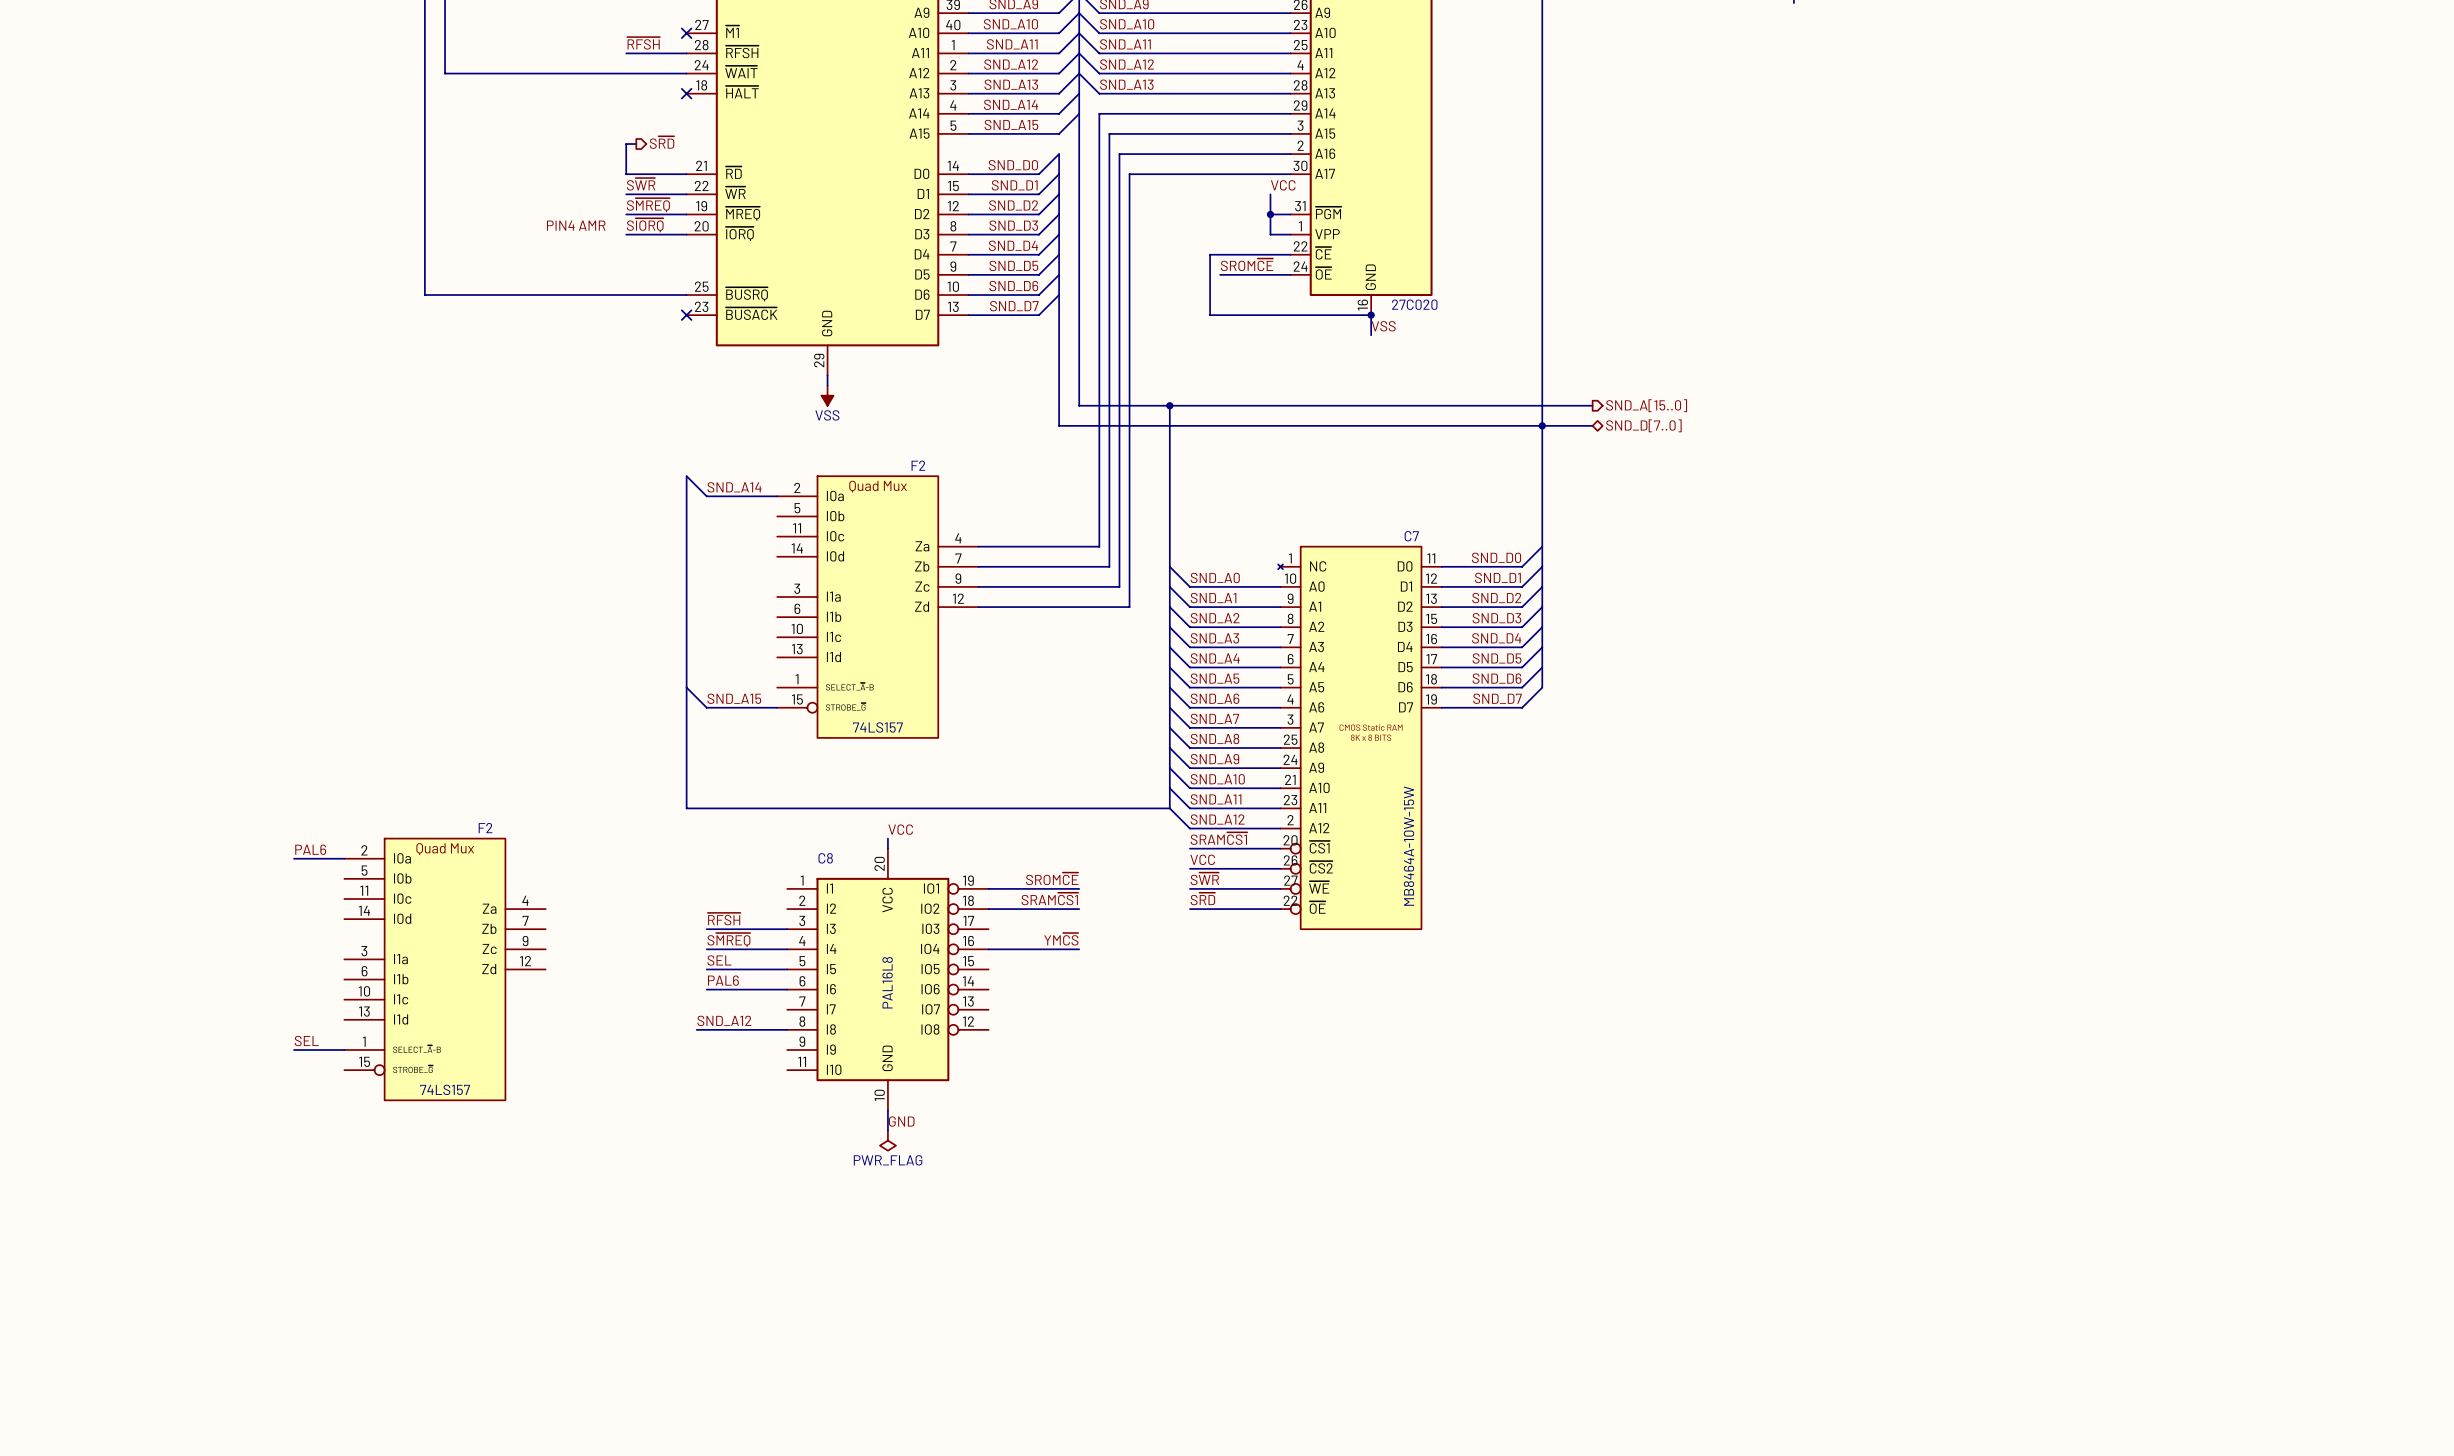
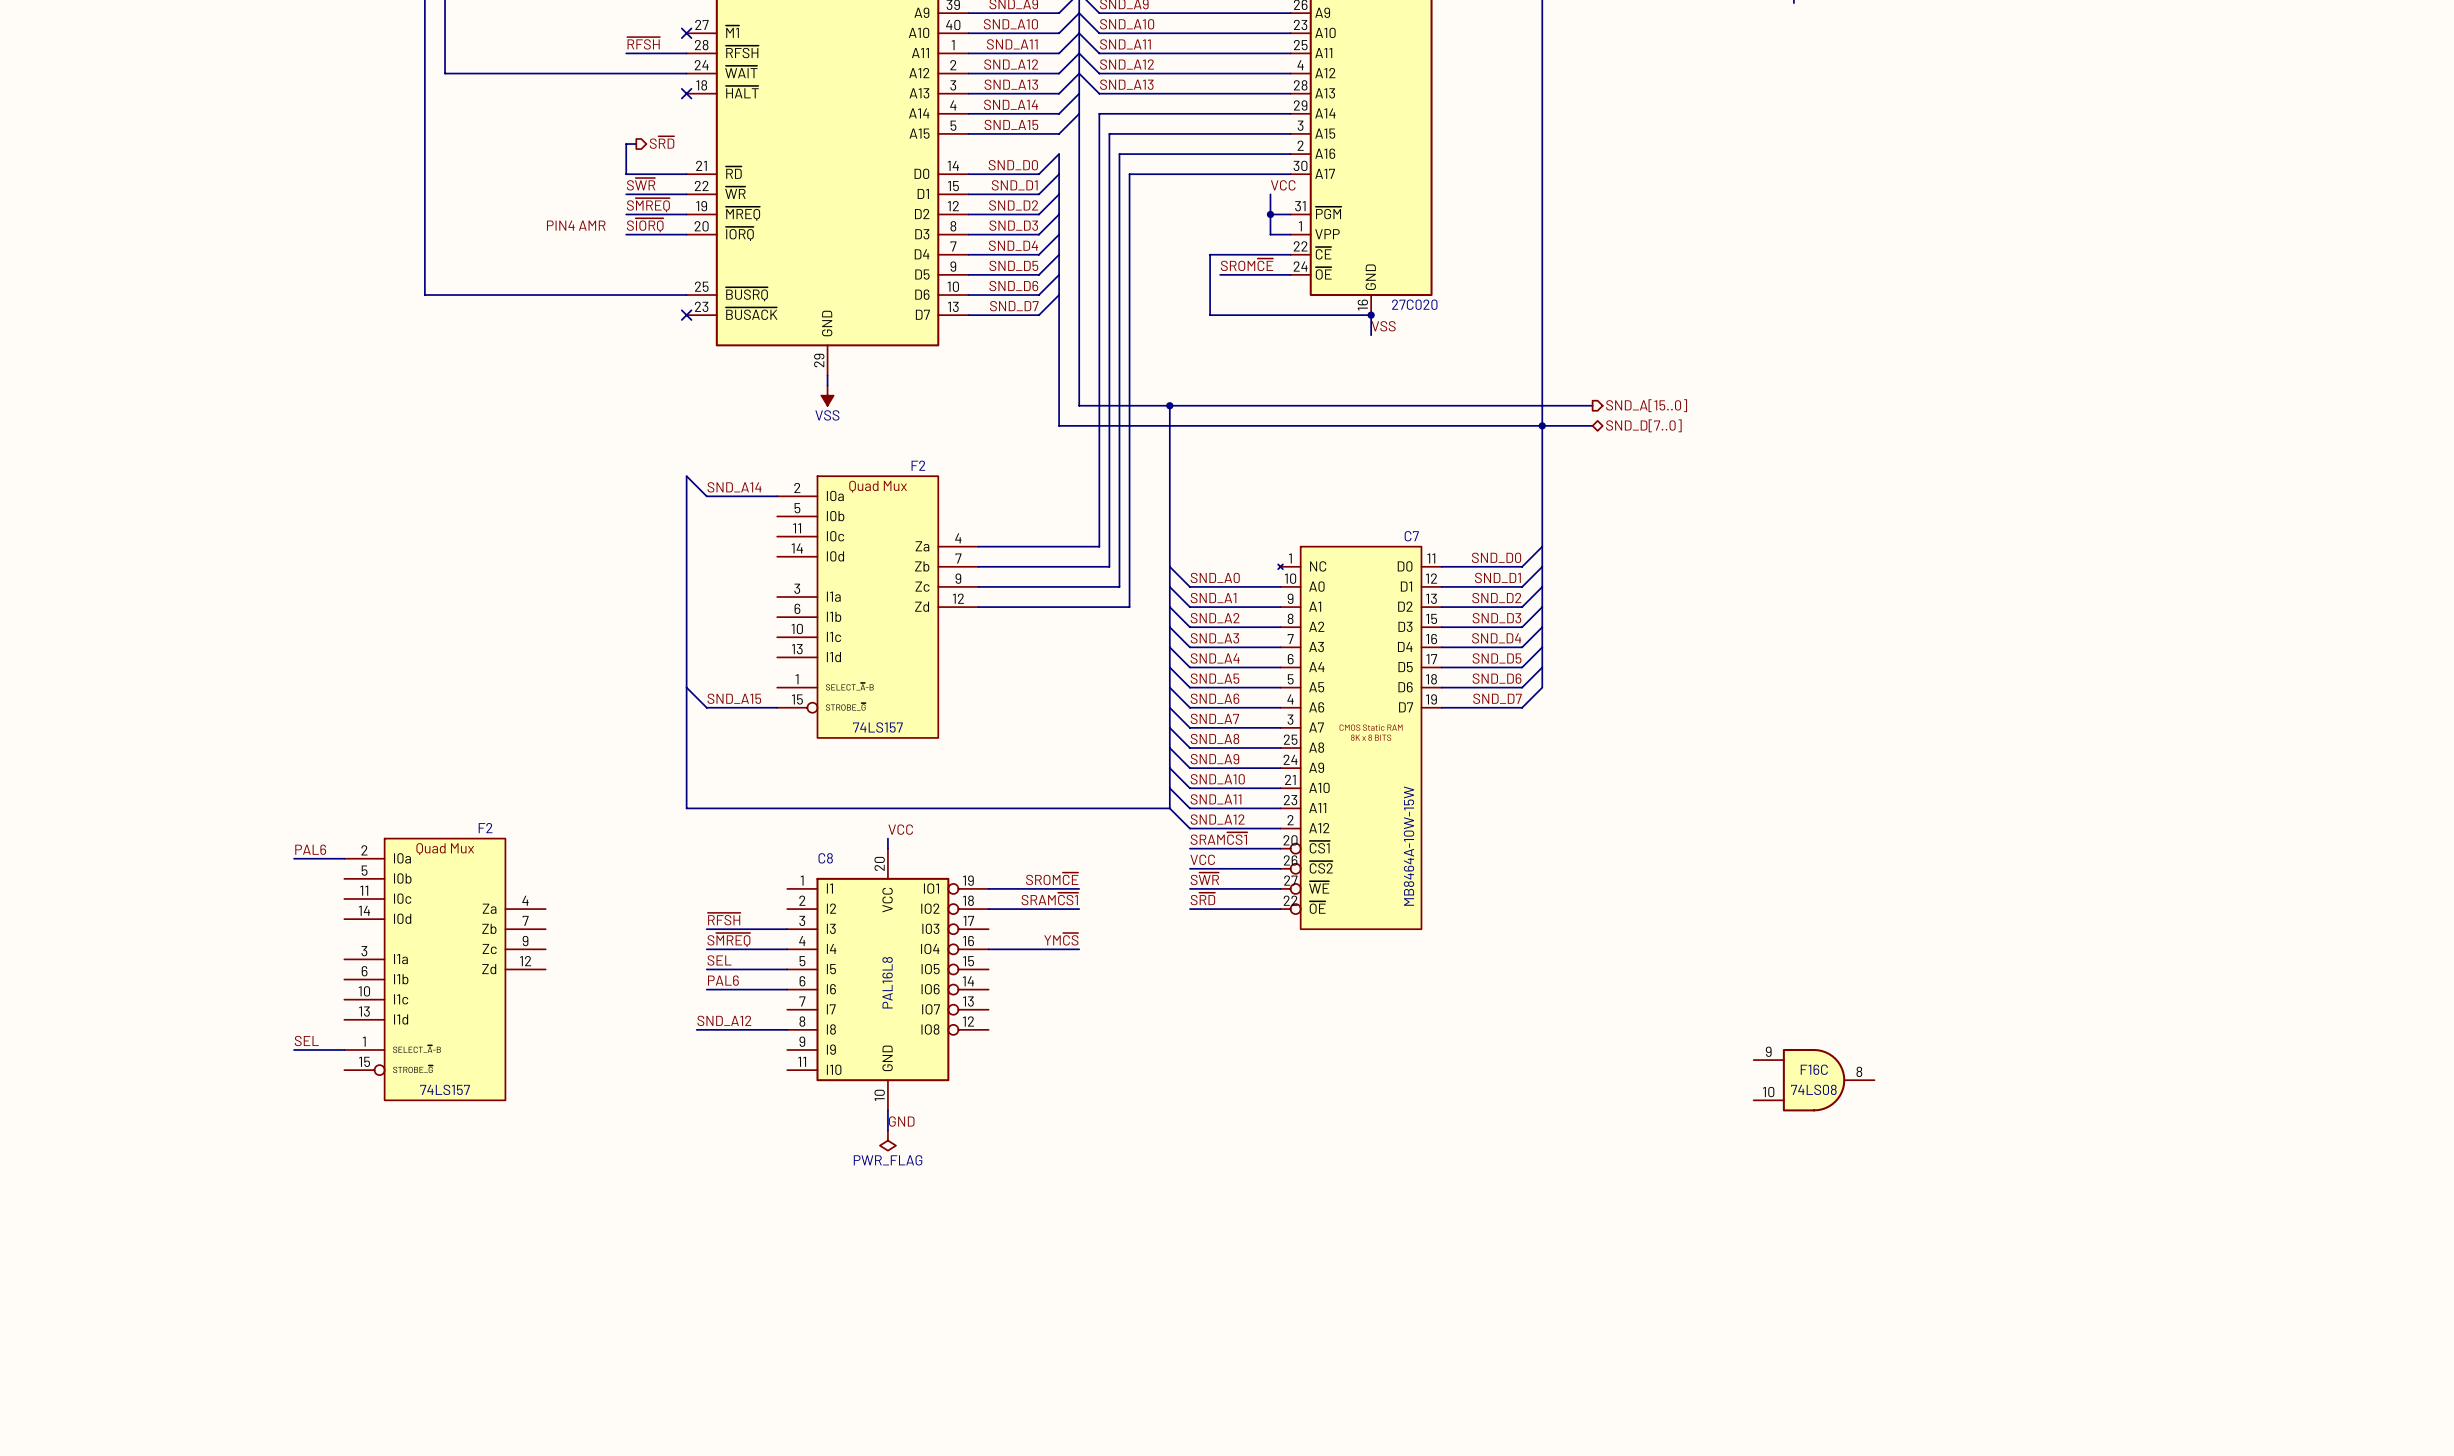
F16C: none -> 74LS08 (1814, 1080)

